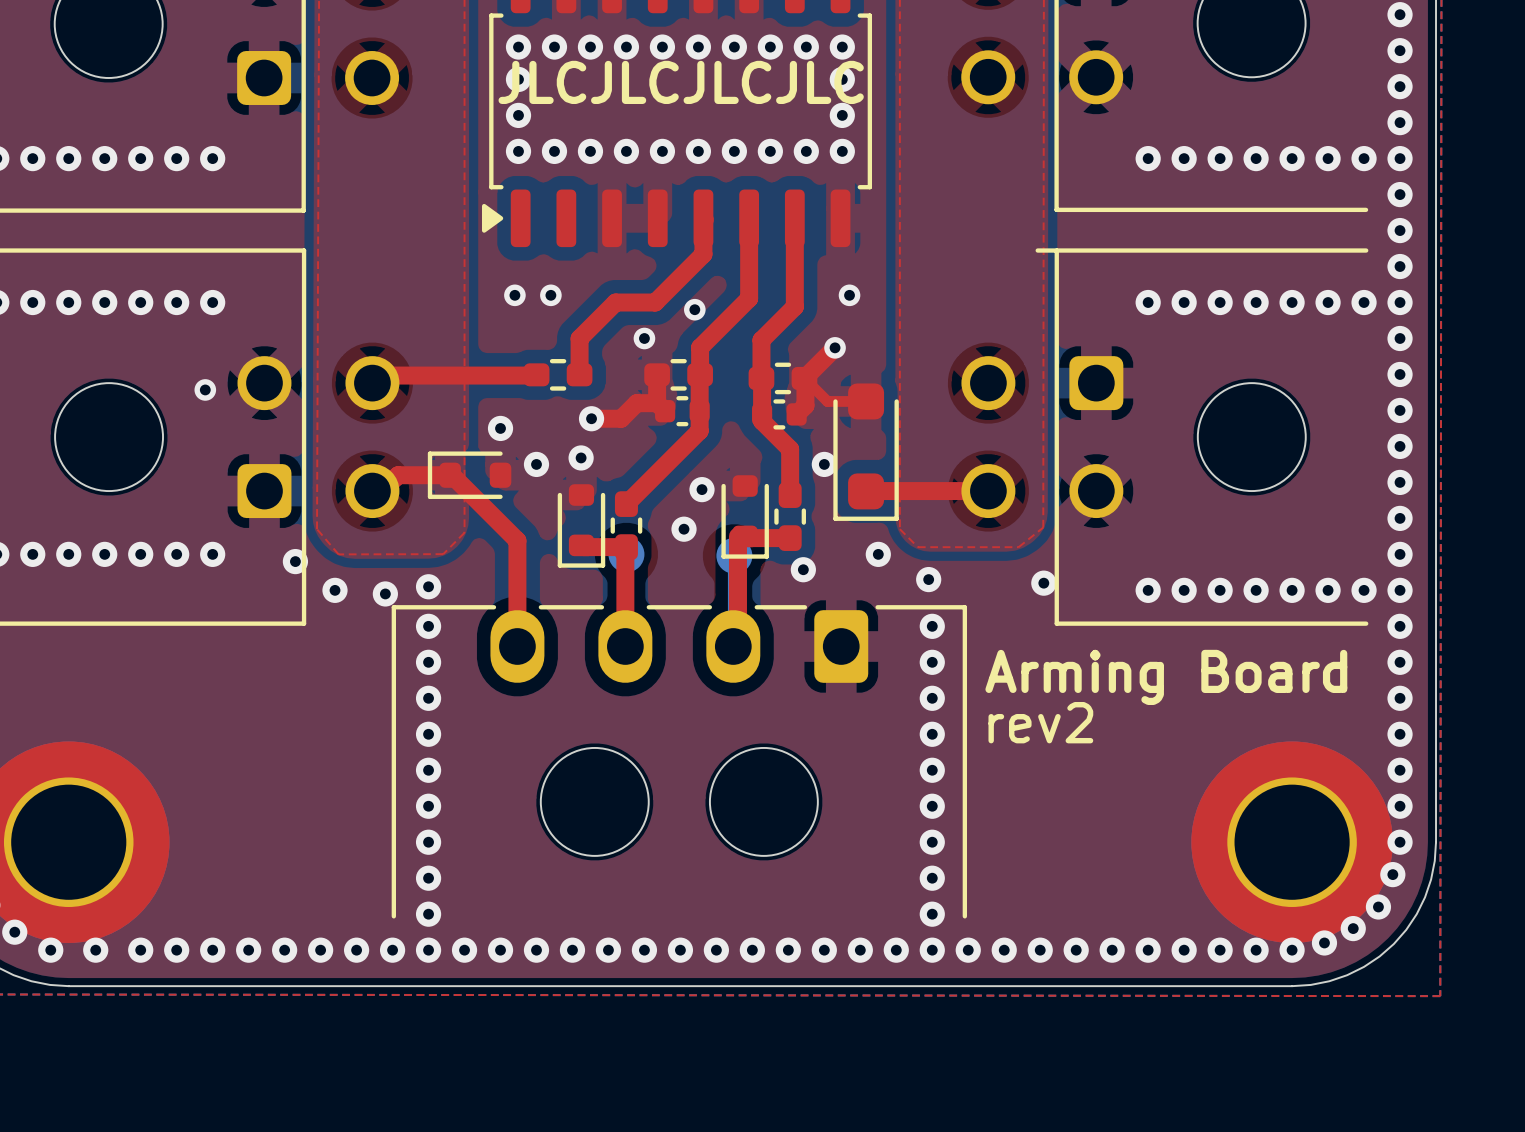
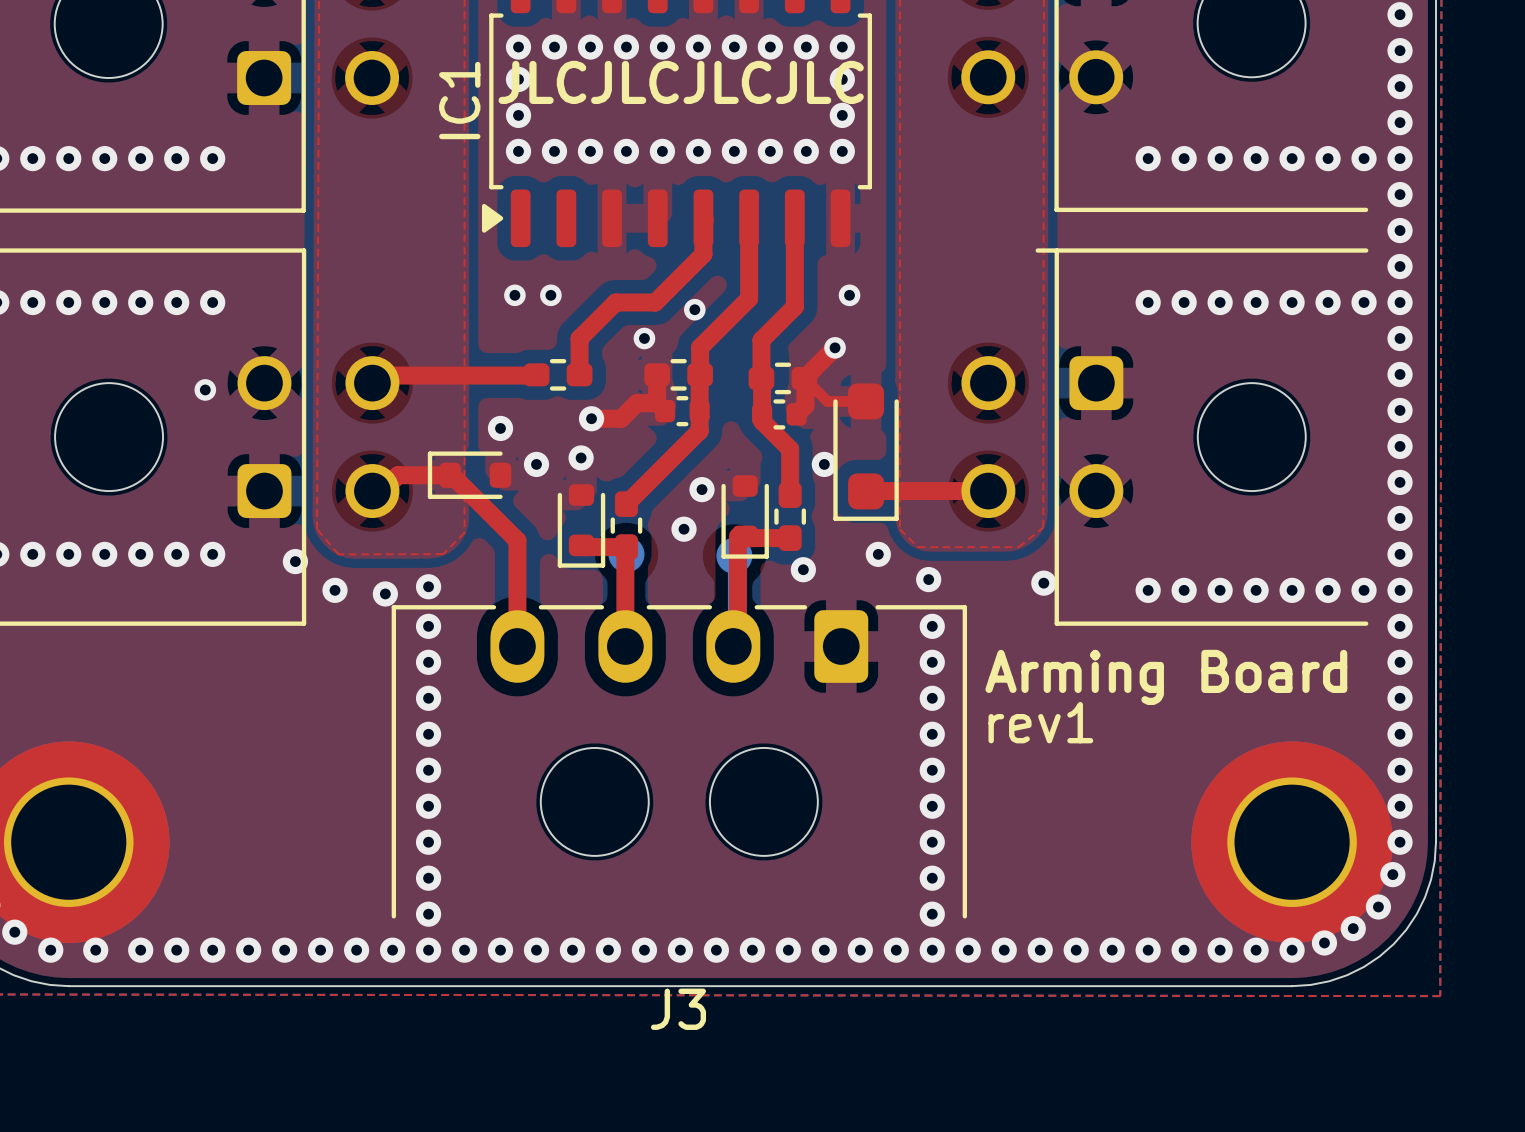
IC1 name: none -> IC1 (459, 100)
text: rev2 (1040, 722) -> rev1 (1040, 722)
J3 name: none -> J3 (678, 1009)

